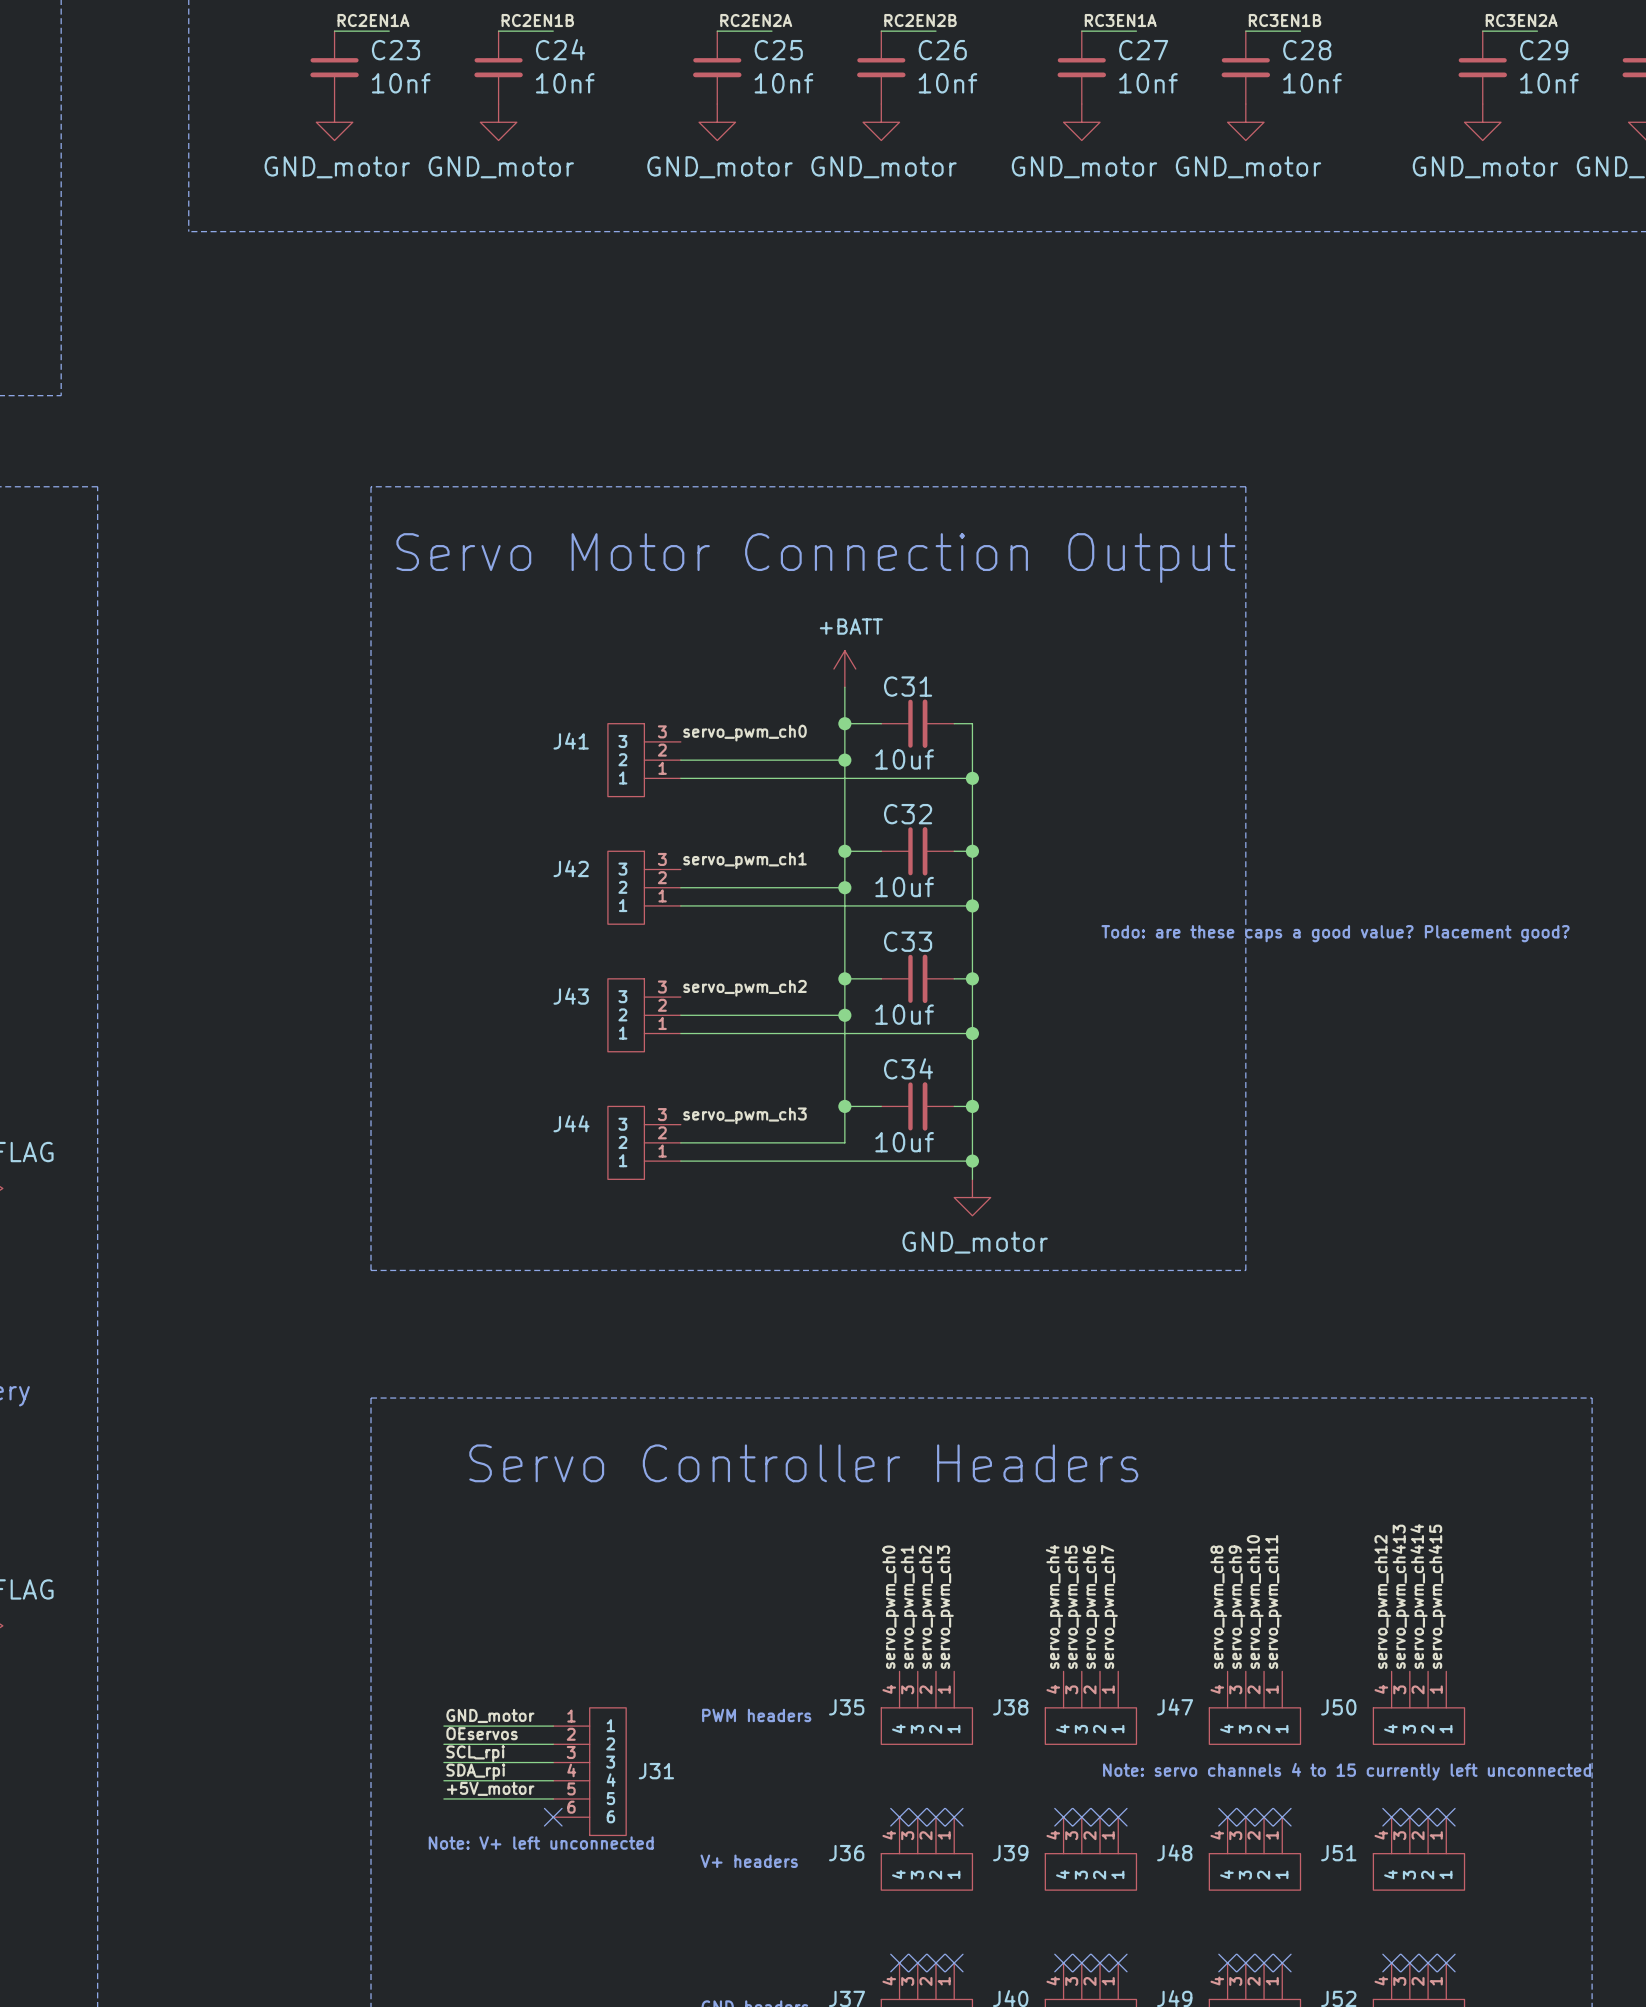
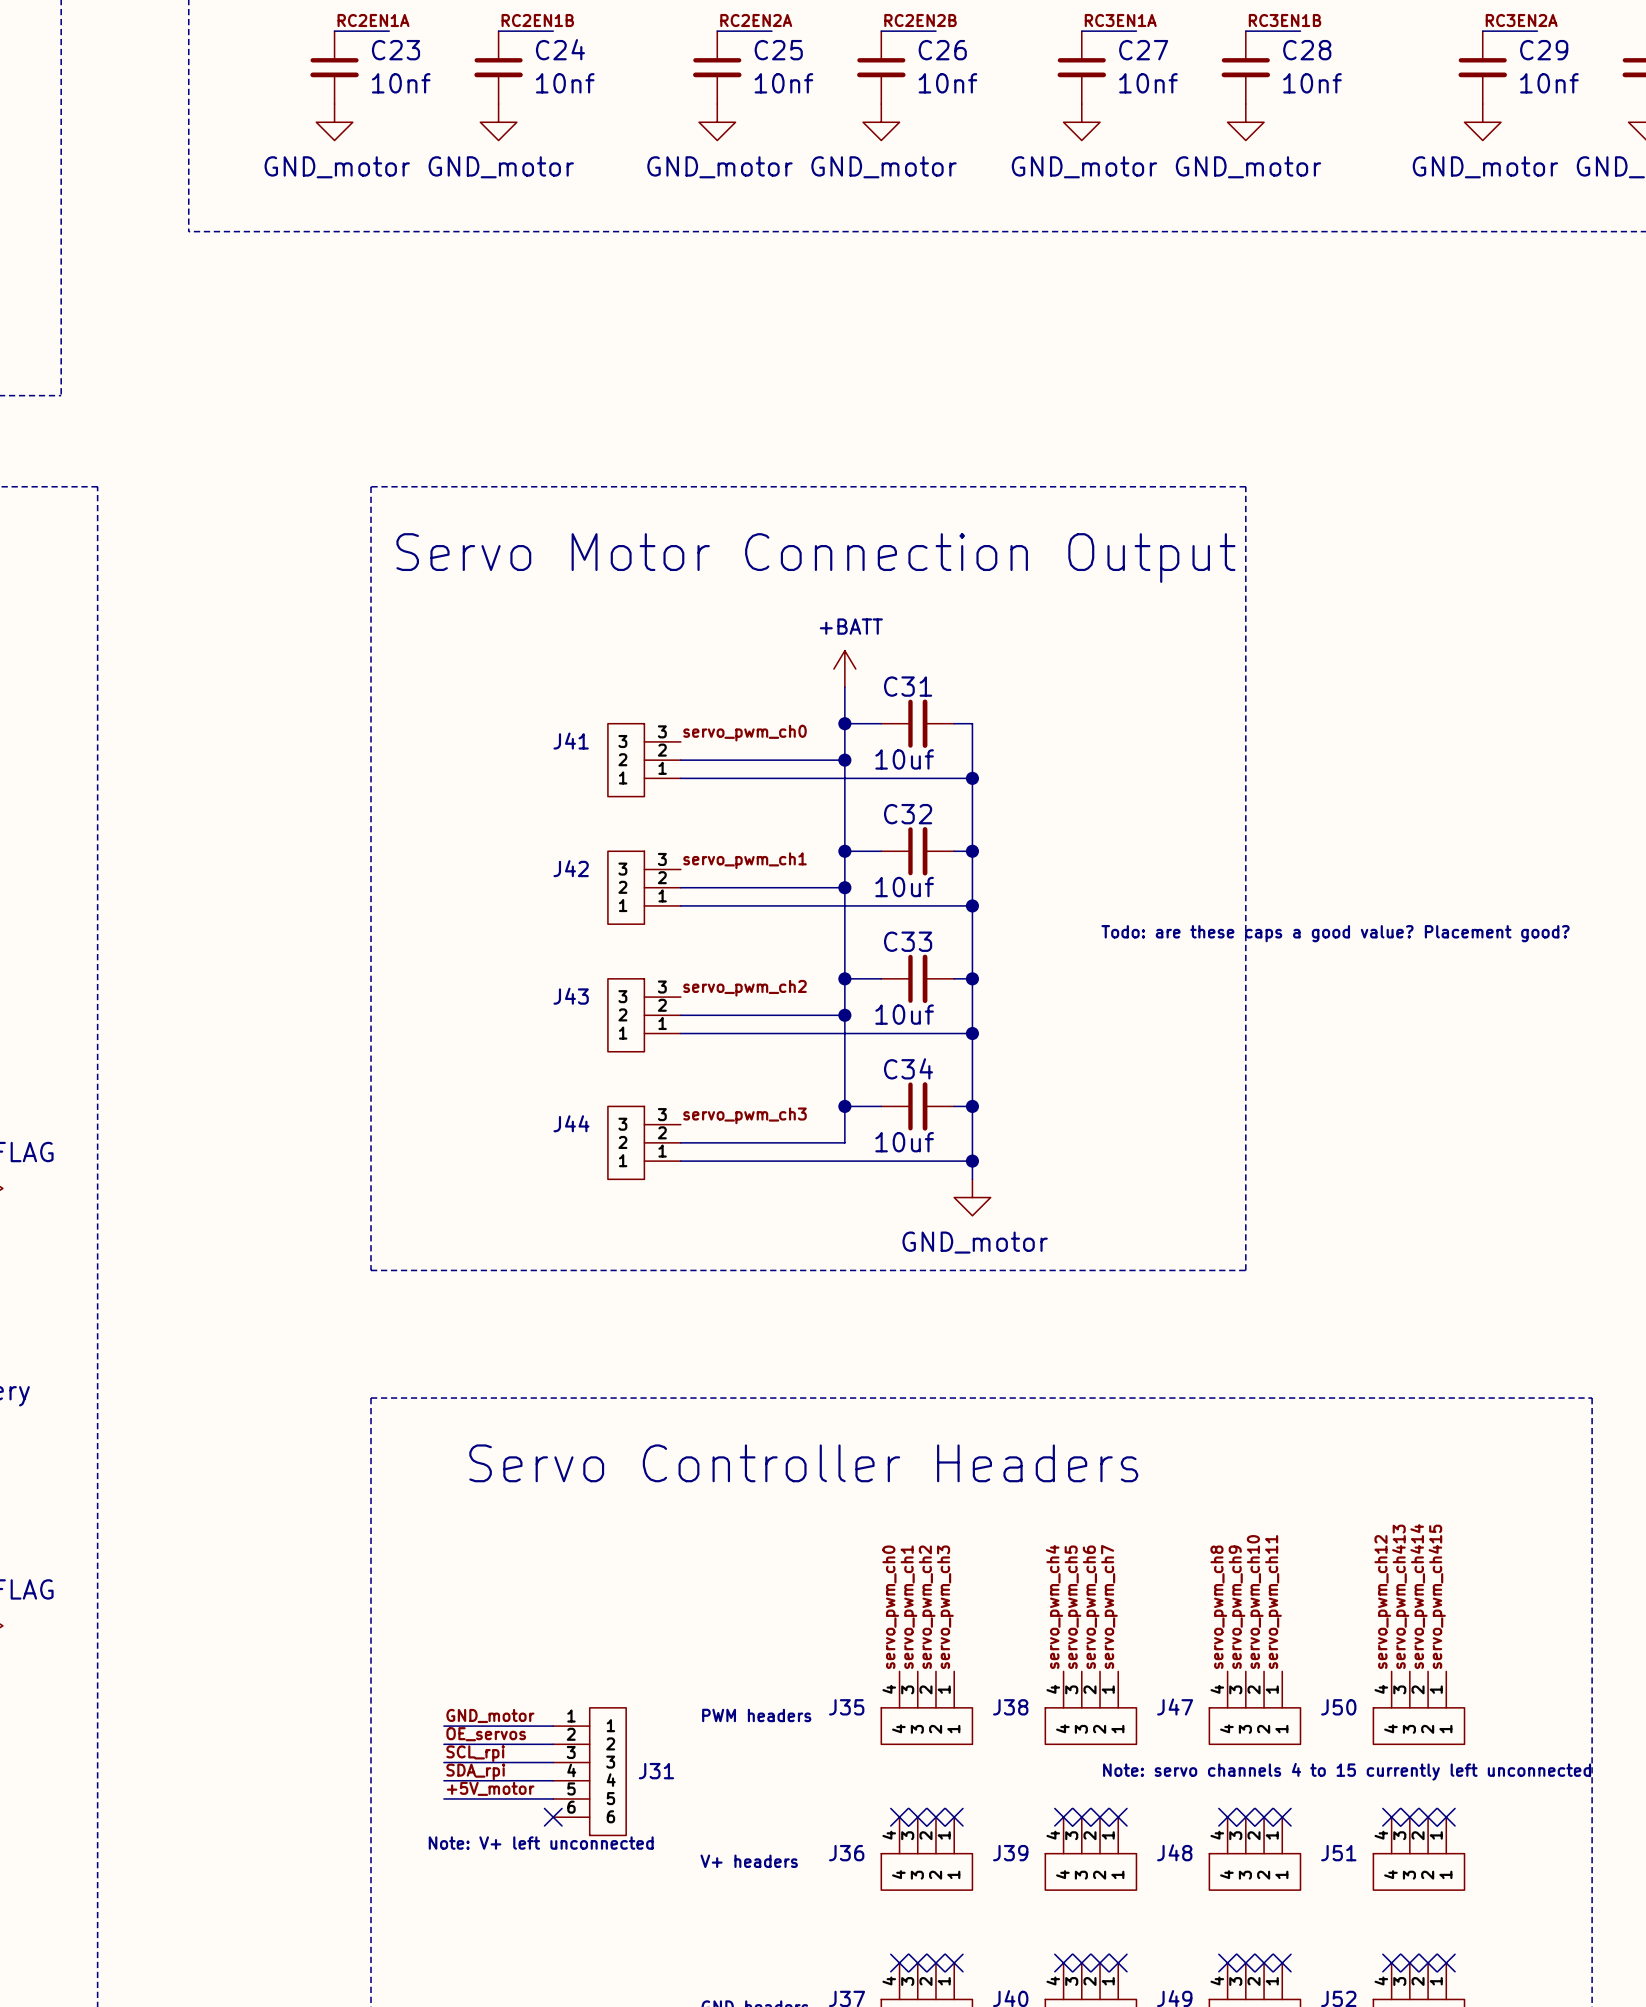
label: OEservos (482, 1733) -> OE_servos (486, 1734)

